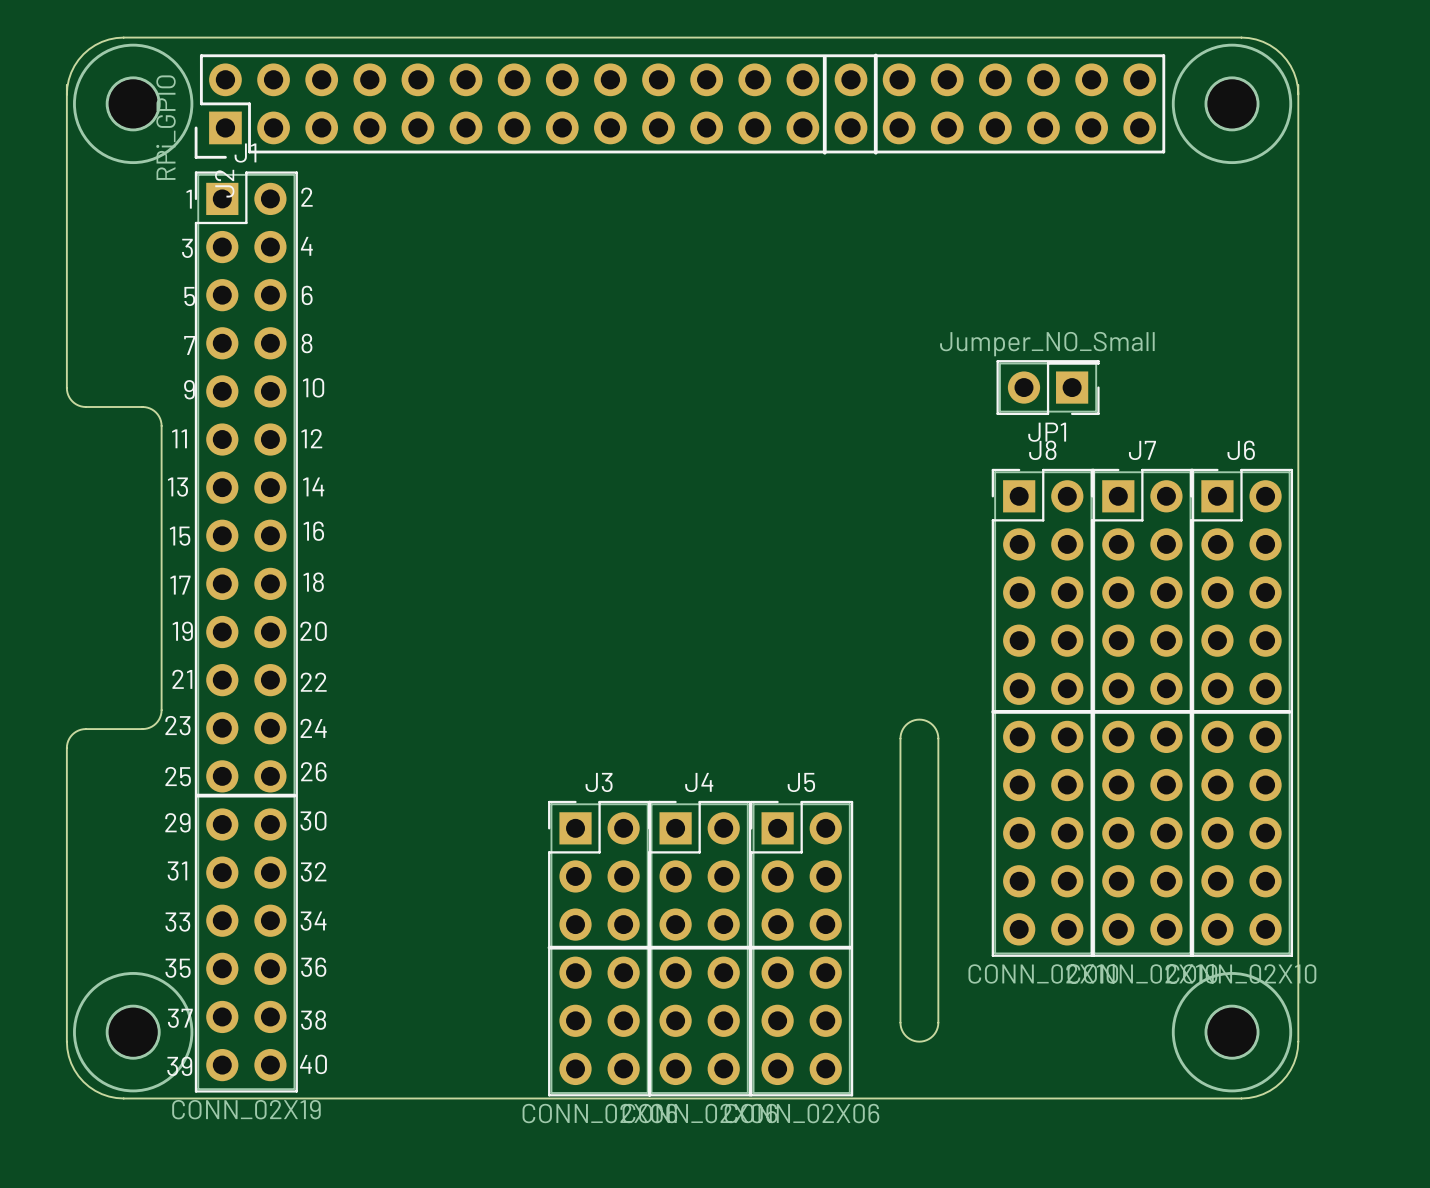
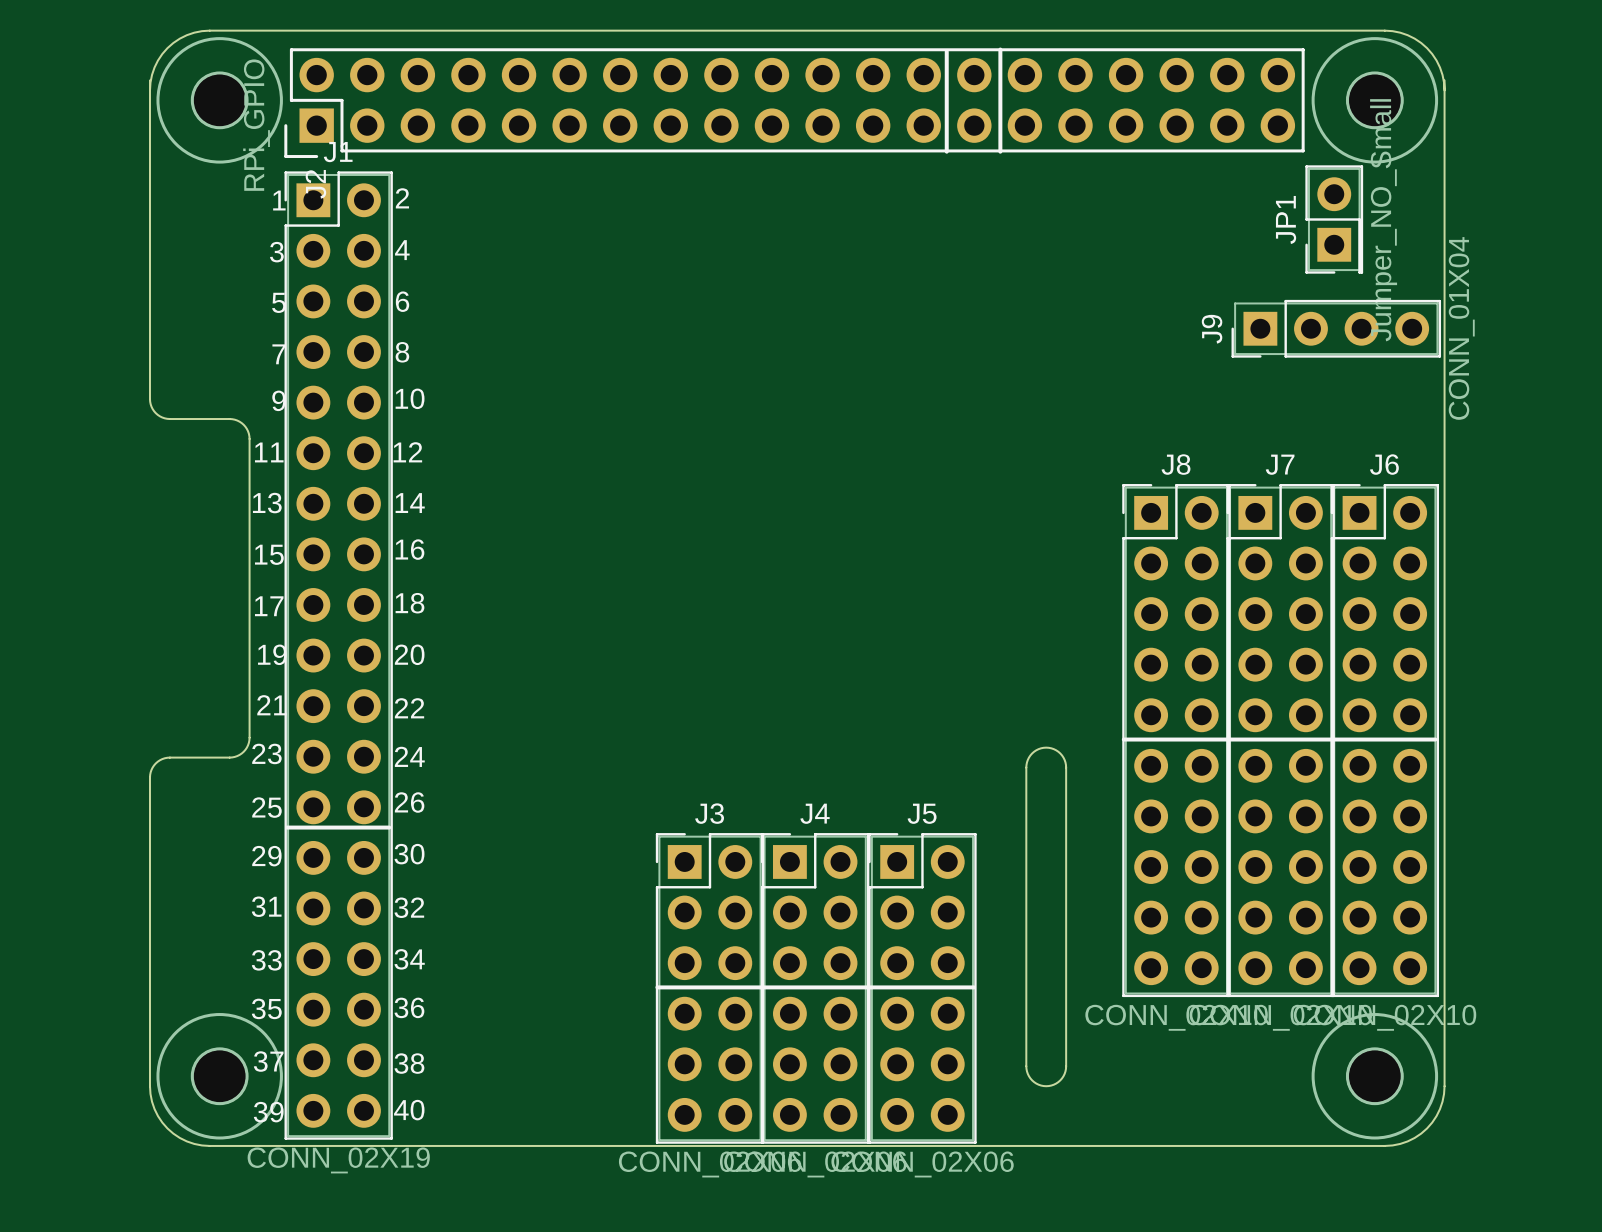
J9: none -> CONN_01X04 (1336, 328)
JP1 rotation: 0° (1048, 387) -> 90° clockwise (1334, 219)
JP1 position: (1048, 387) -> (1334, 219)

